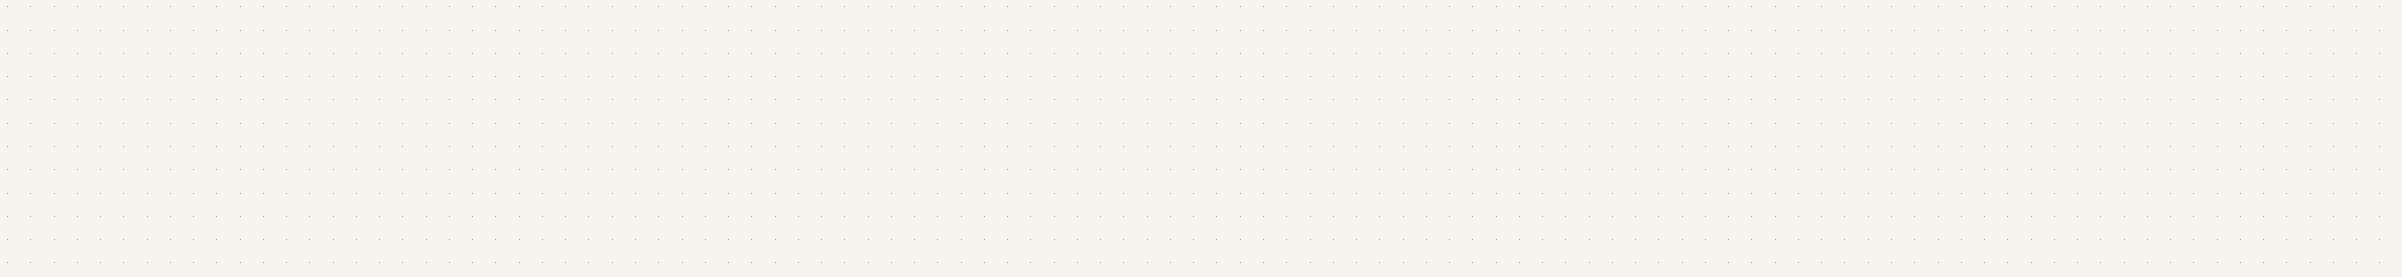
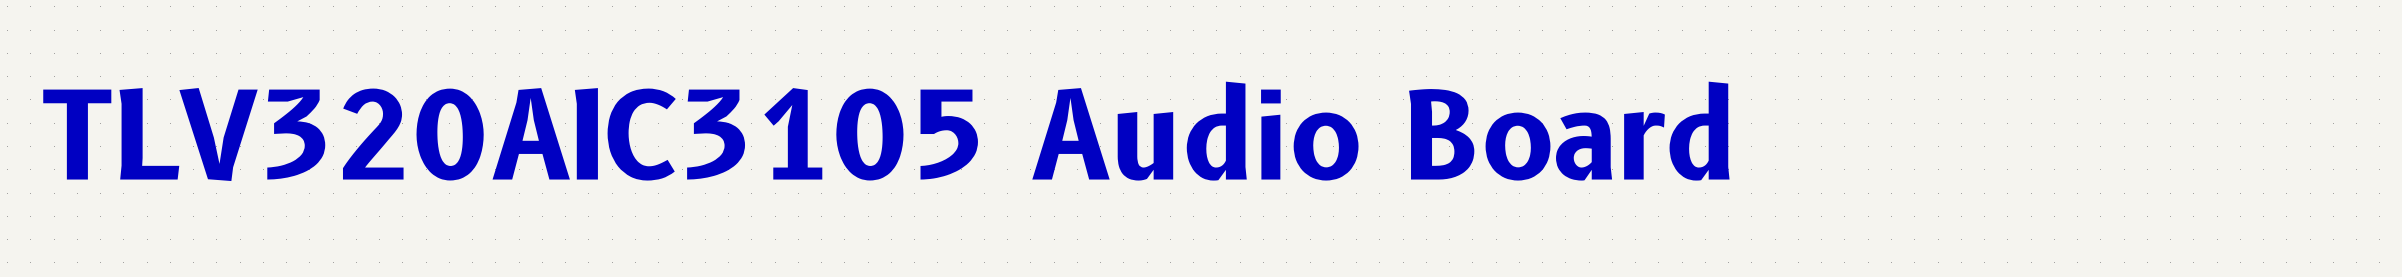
text: none -> TLV320AIC3105 Audio Board (886, 131)

